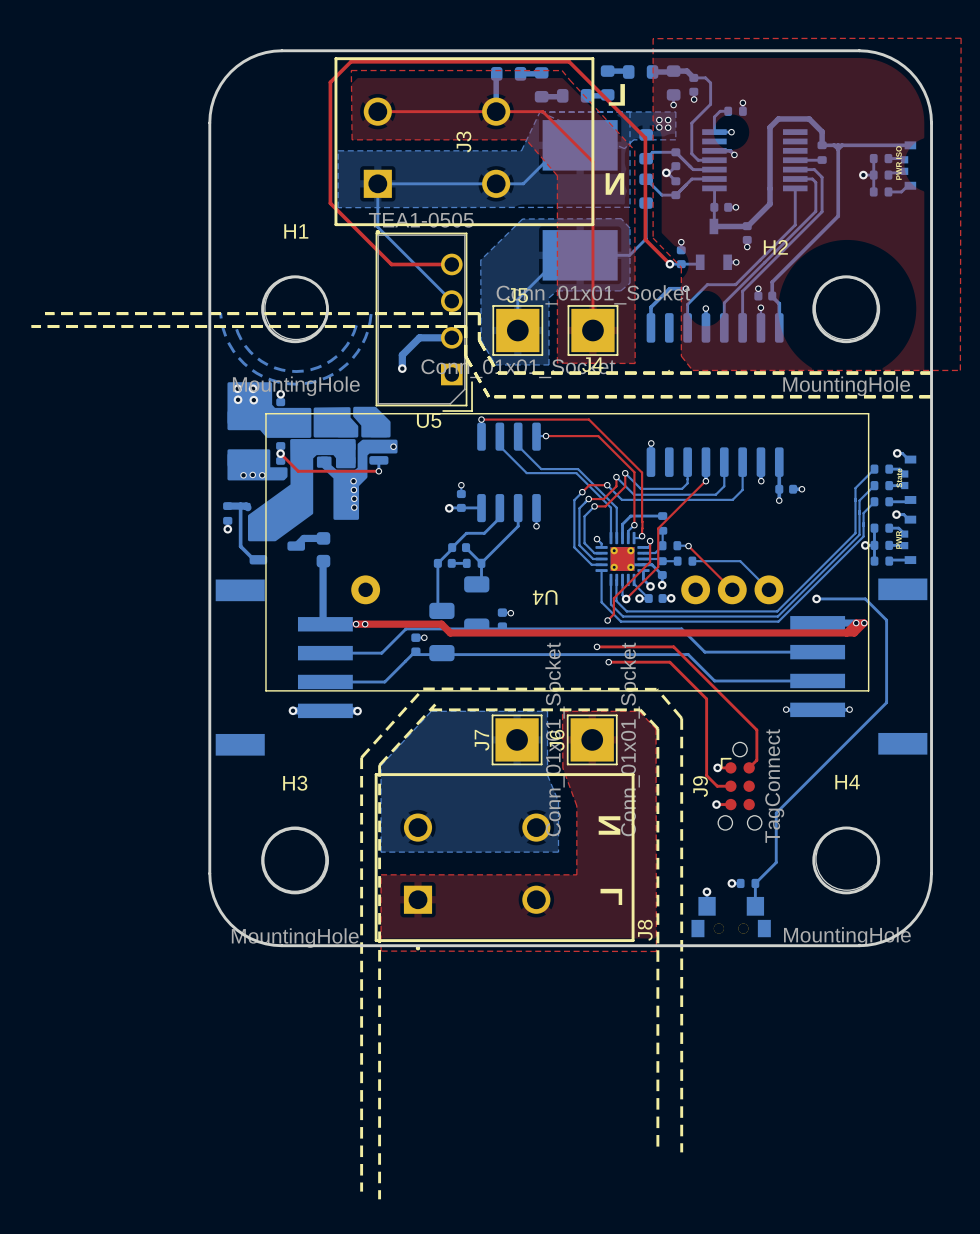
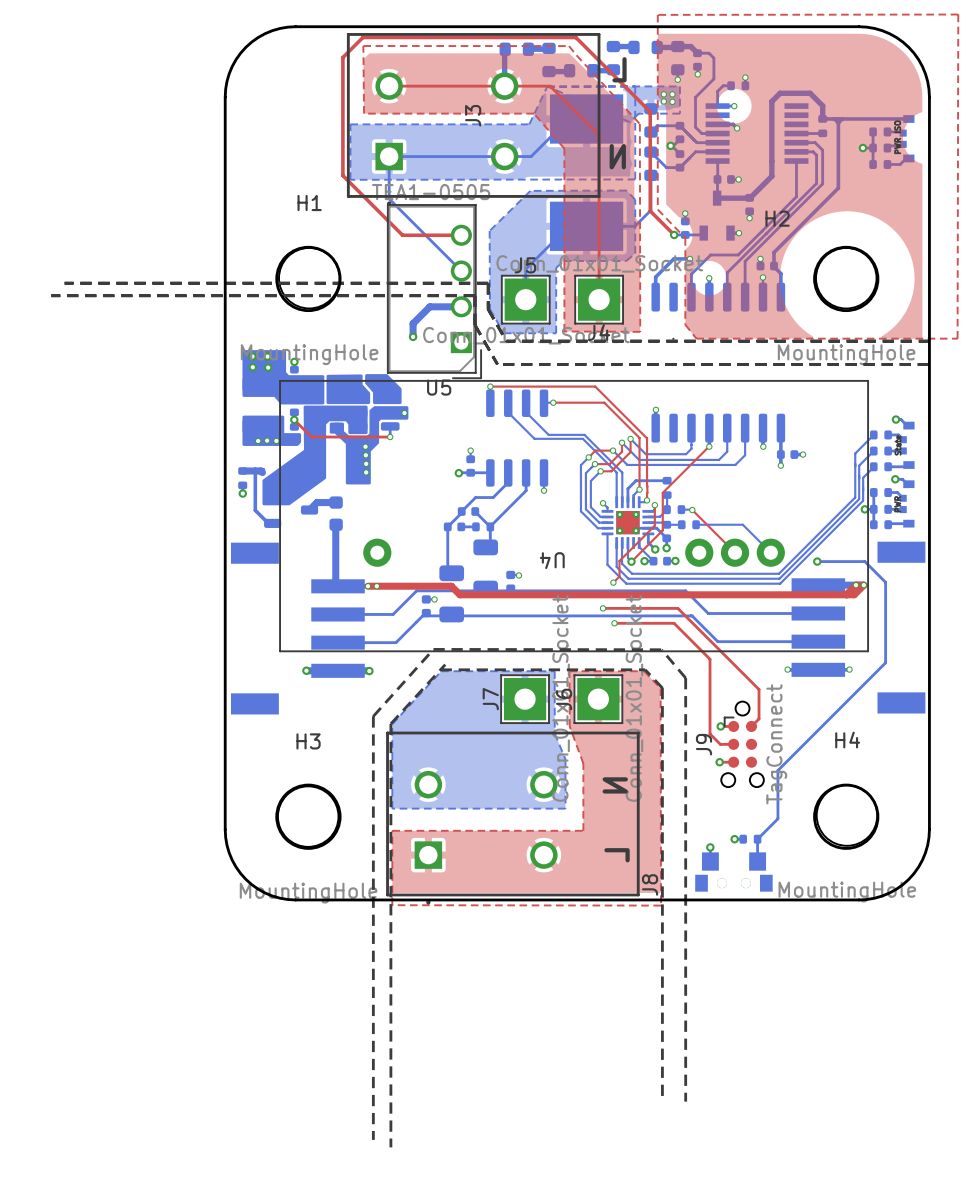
bottom track: (220, 312) (223, 328) (229, 344) (243, 363) (263, 377) (279, 382) (295, 384) (319, 380) (334, 373) (347, 364) (357, 351) (365, 337) (371, 314) -> none
bottom track: (356, 325) (346, 345) (337, 356) (318, 367) (296, 371) (281, 369) (261, 361) (245, 346) (235, 326) -> none

